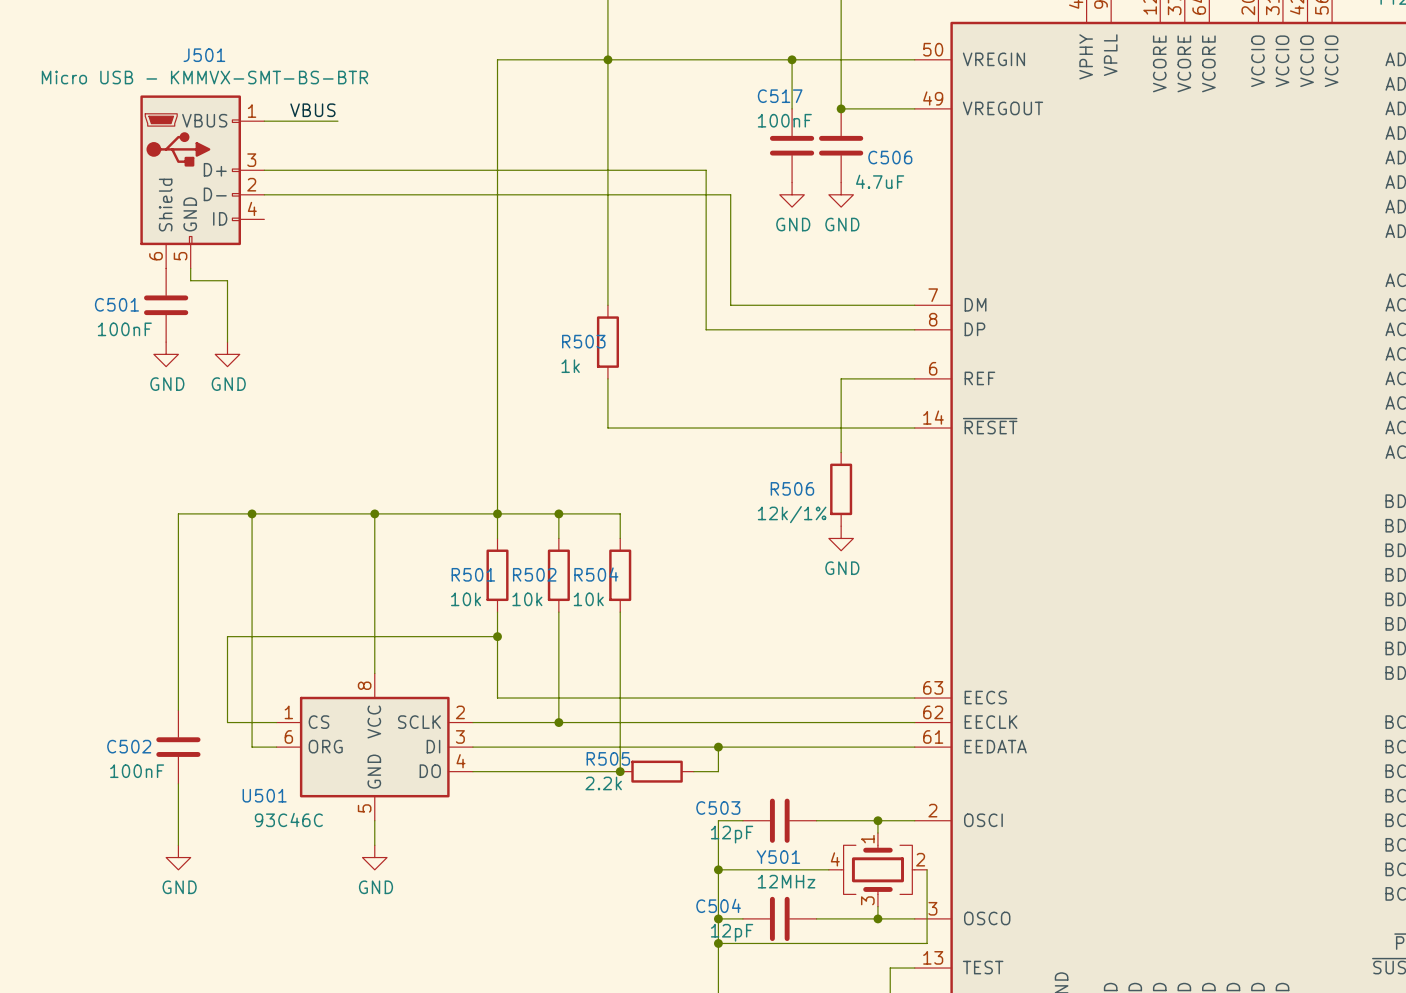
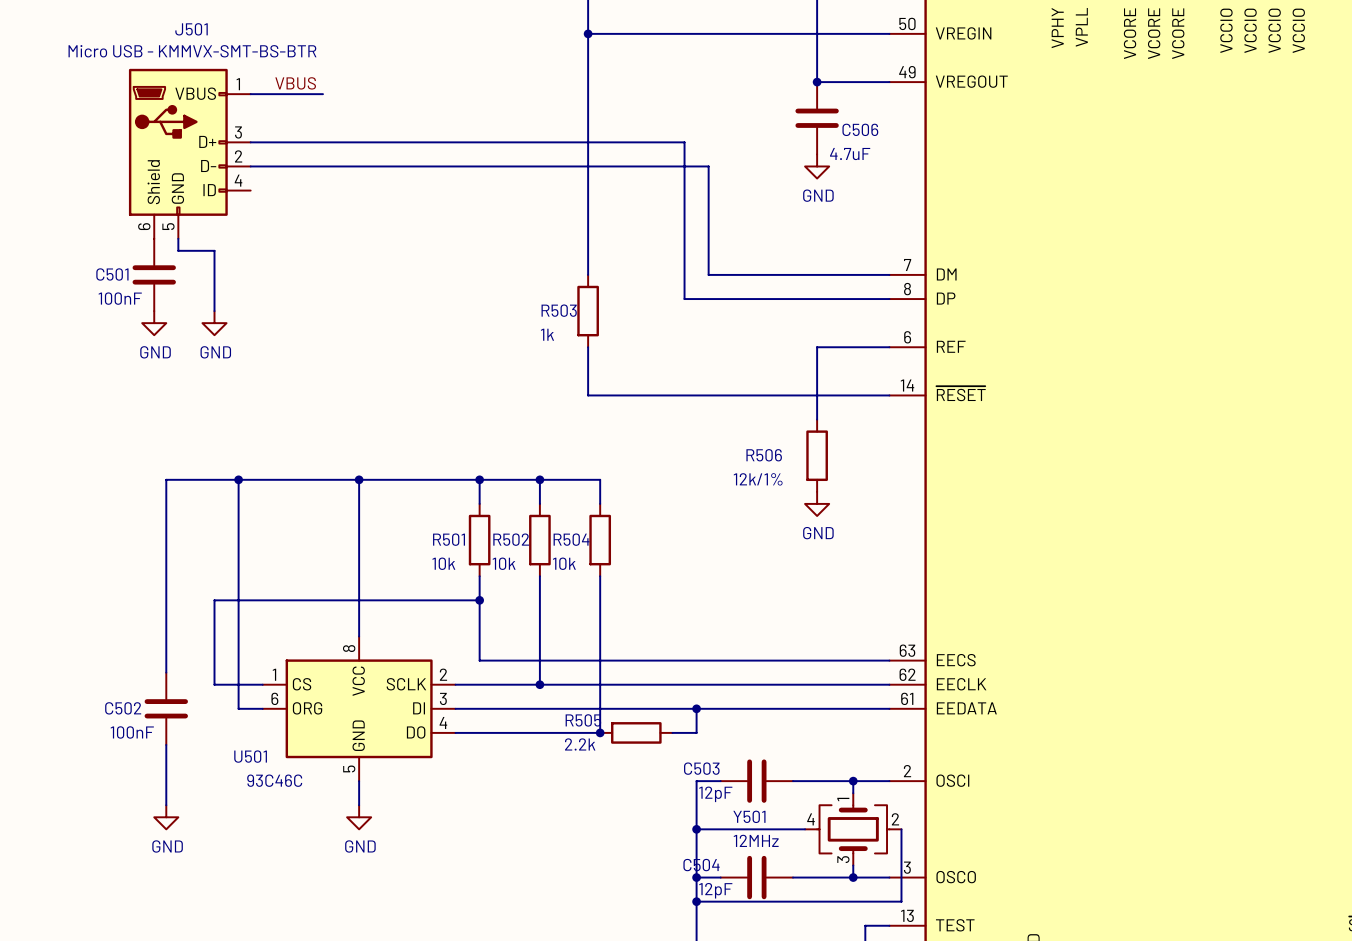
wire: (607, 59) (497, 59) (497, 513) -> none
wire: (792, 59) (792, 108) -> none
junction: (792, 59) -> none
C517: 100nF (792, 145) -> none
power symbol: GND (792, 194) -> none

